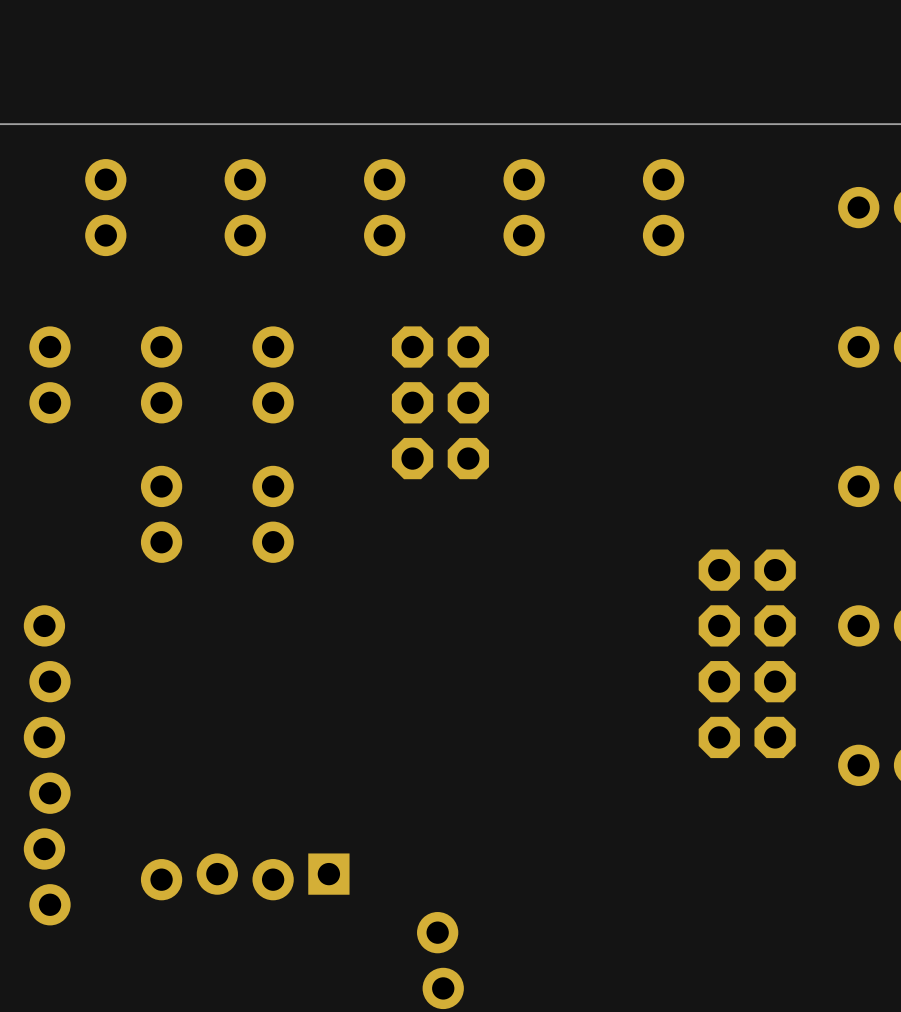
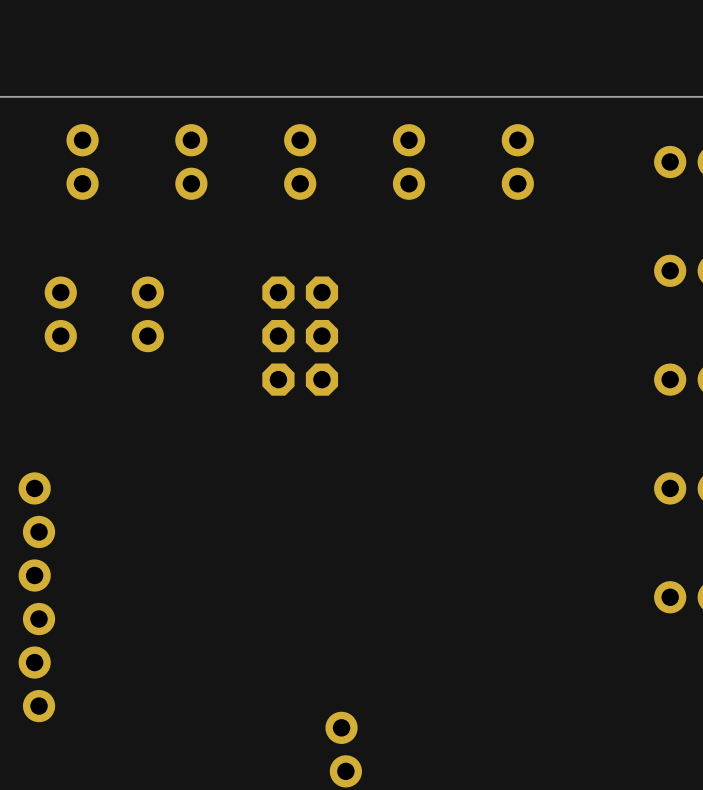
part position: (50, 374) -> (60, 314)
part position: (161, 374) -> (147, 314)
part: (273, 374) -> none
part position: (440, 402) -> (300, 336)
part: (161, 514) -> none
part: (273, 514) -> none
part: (747, 653) -> none
part: (245, 876) -> none

